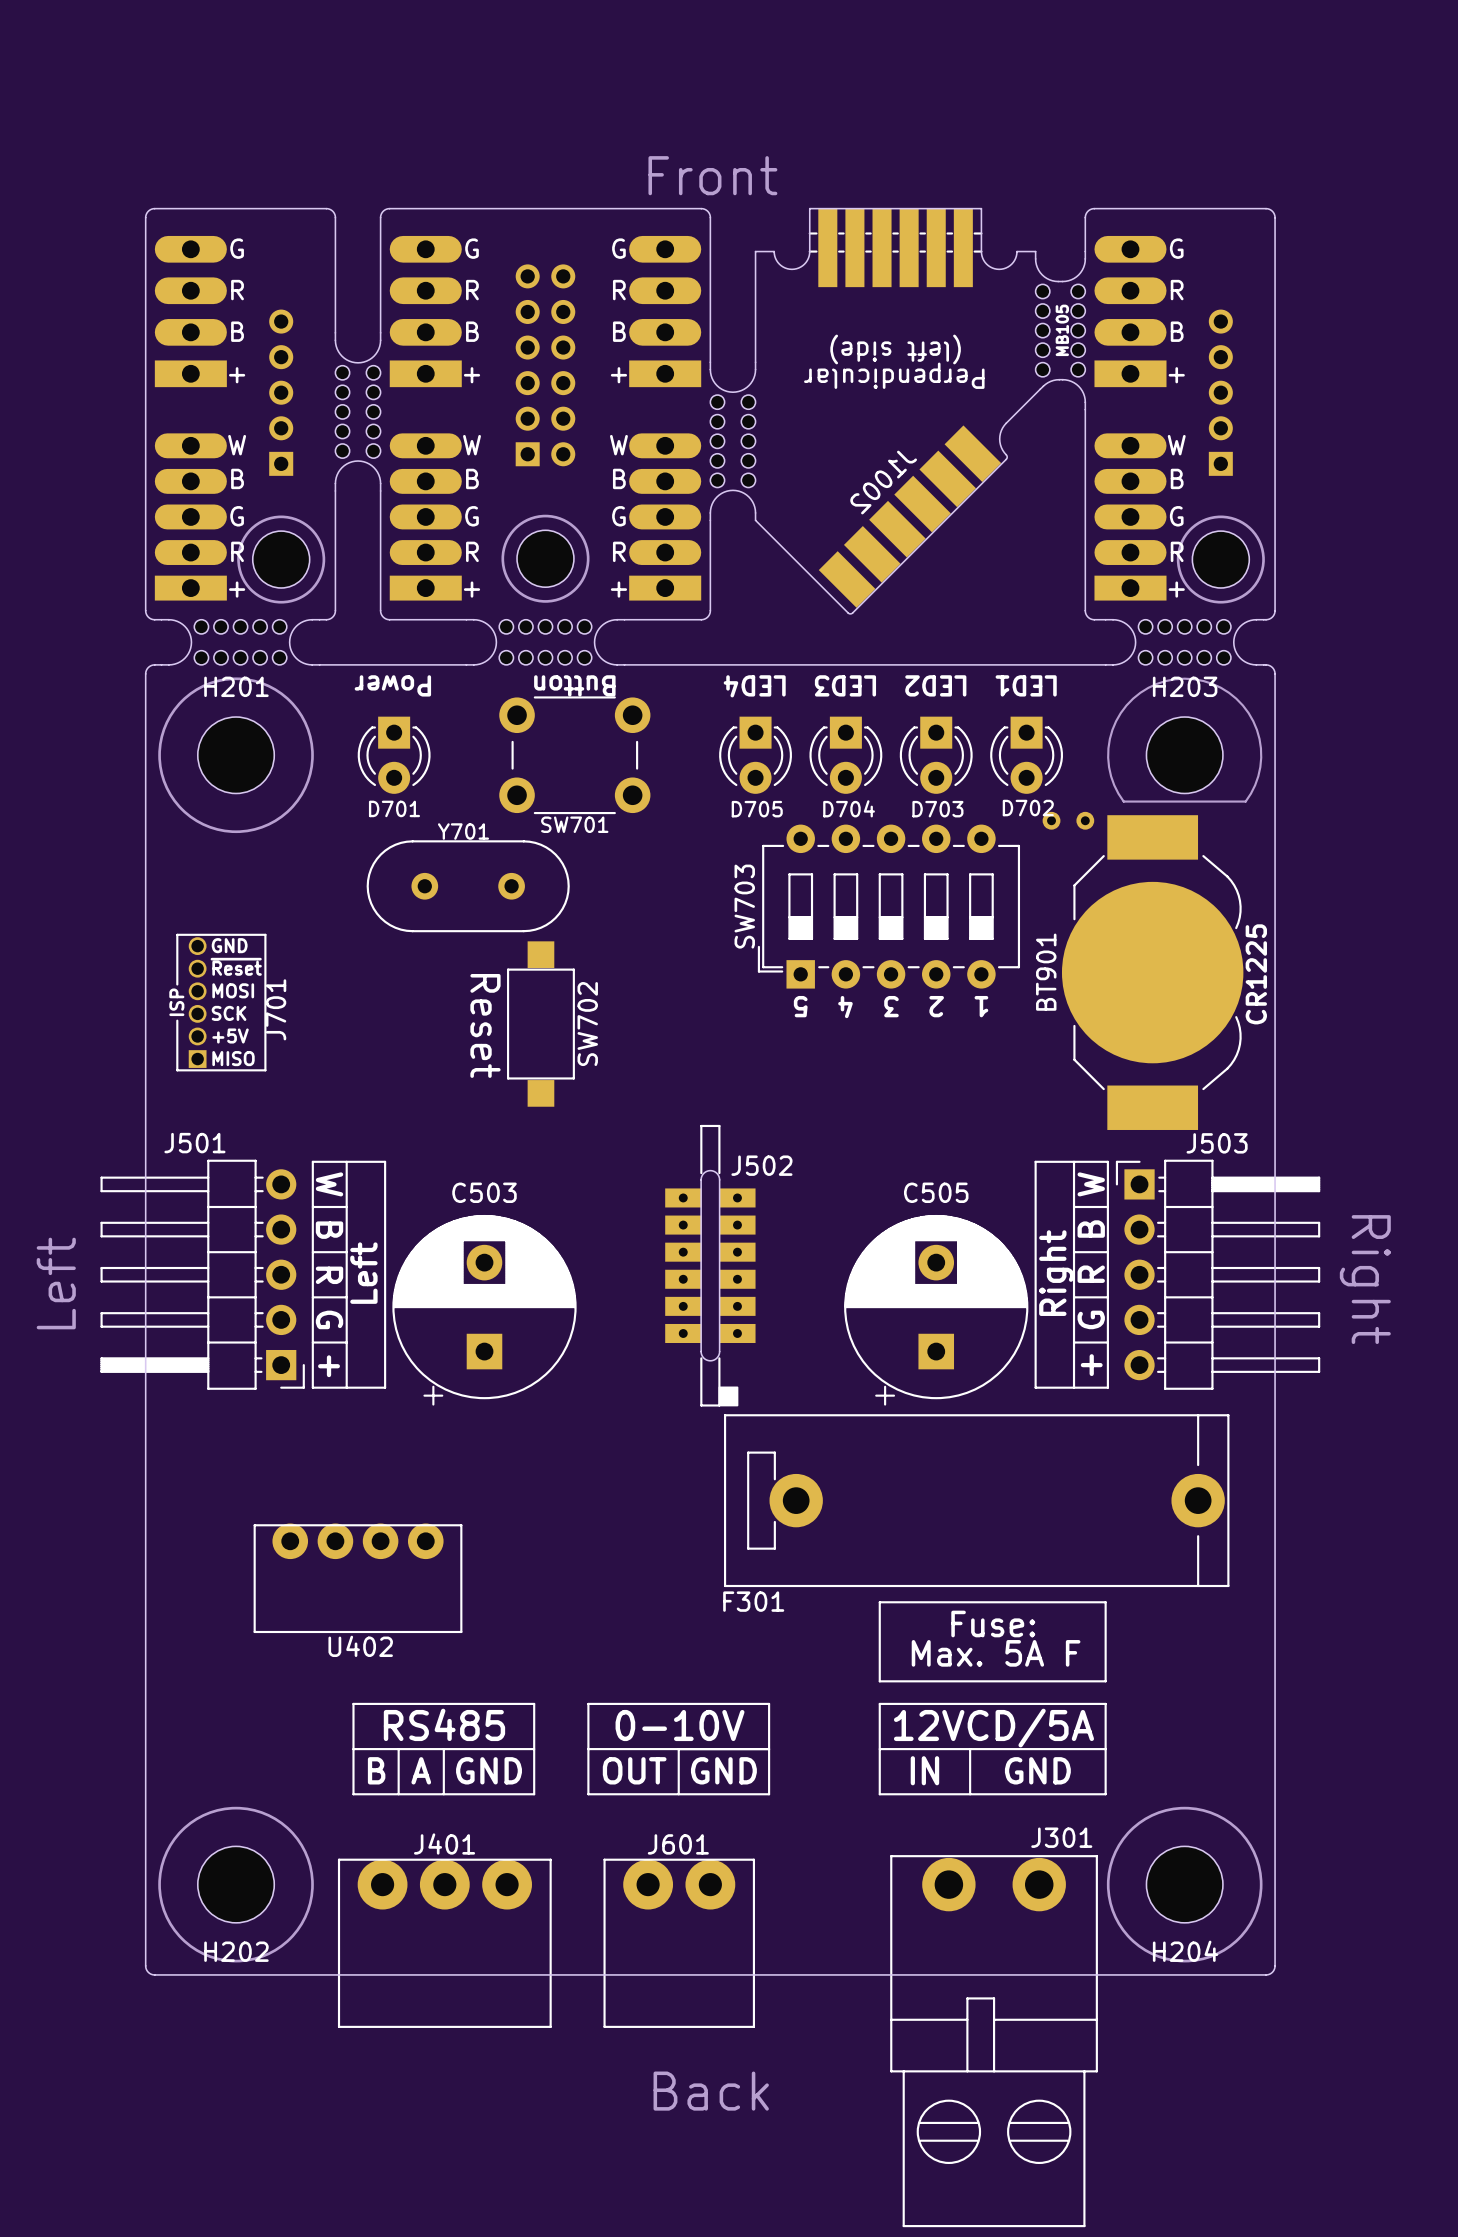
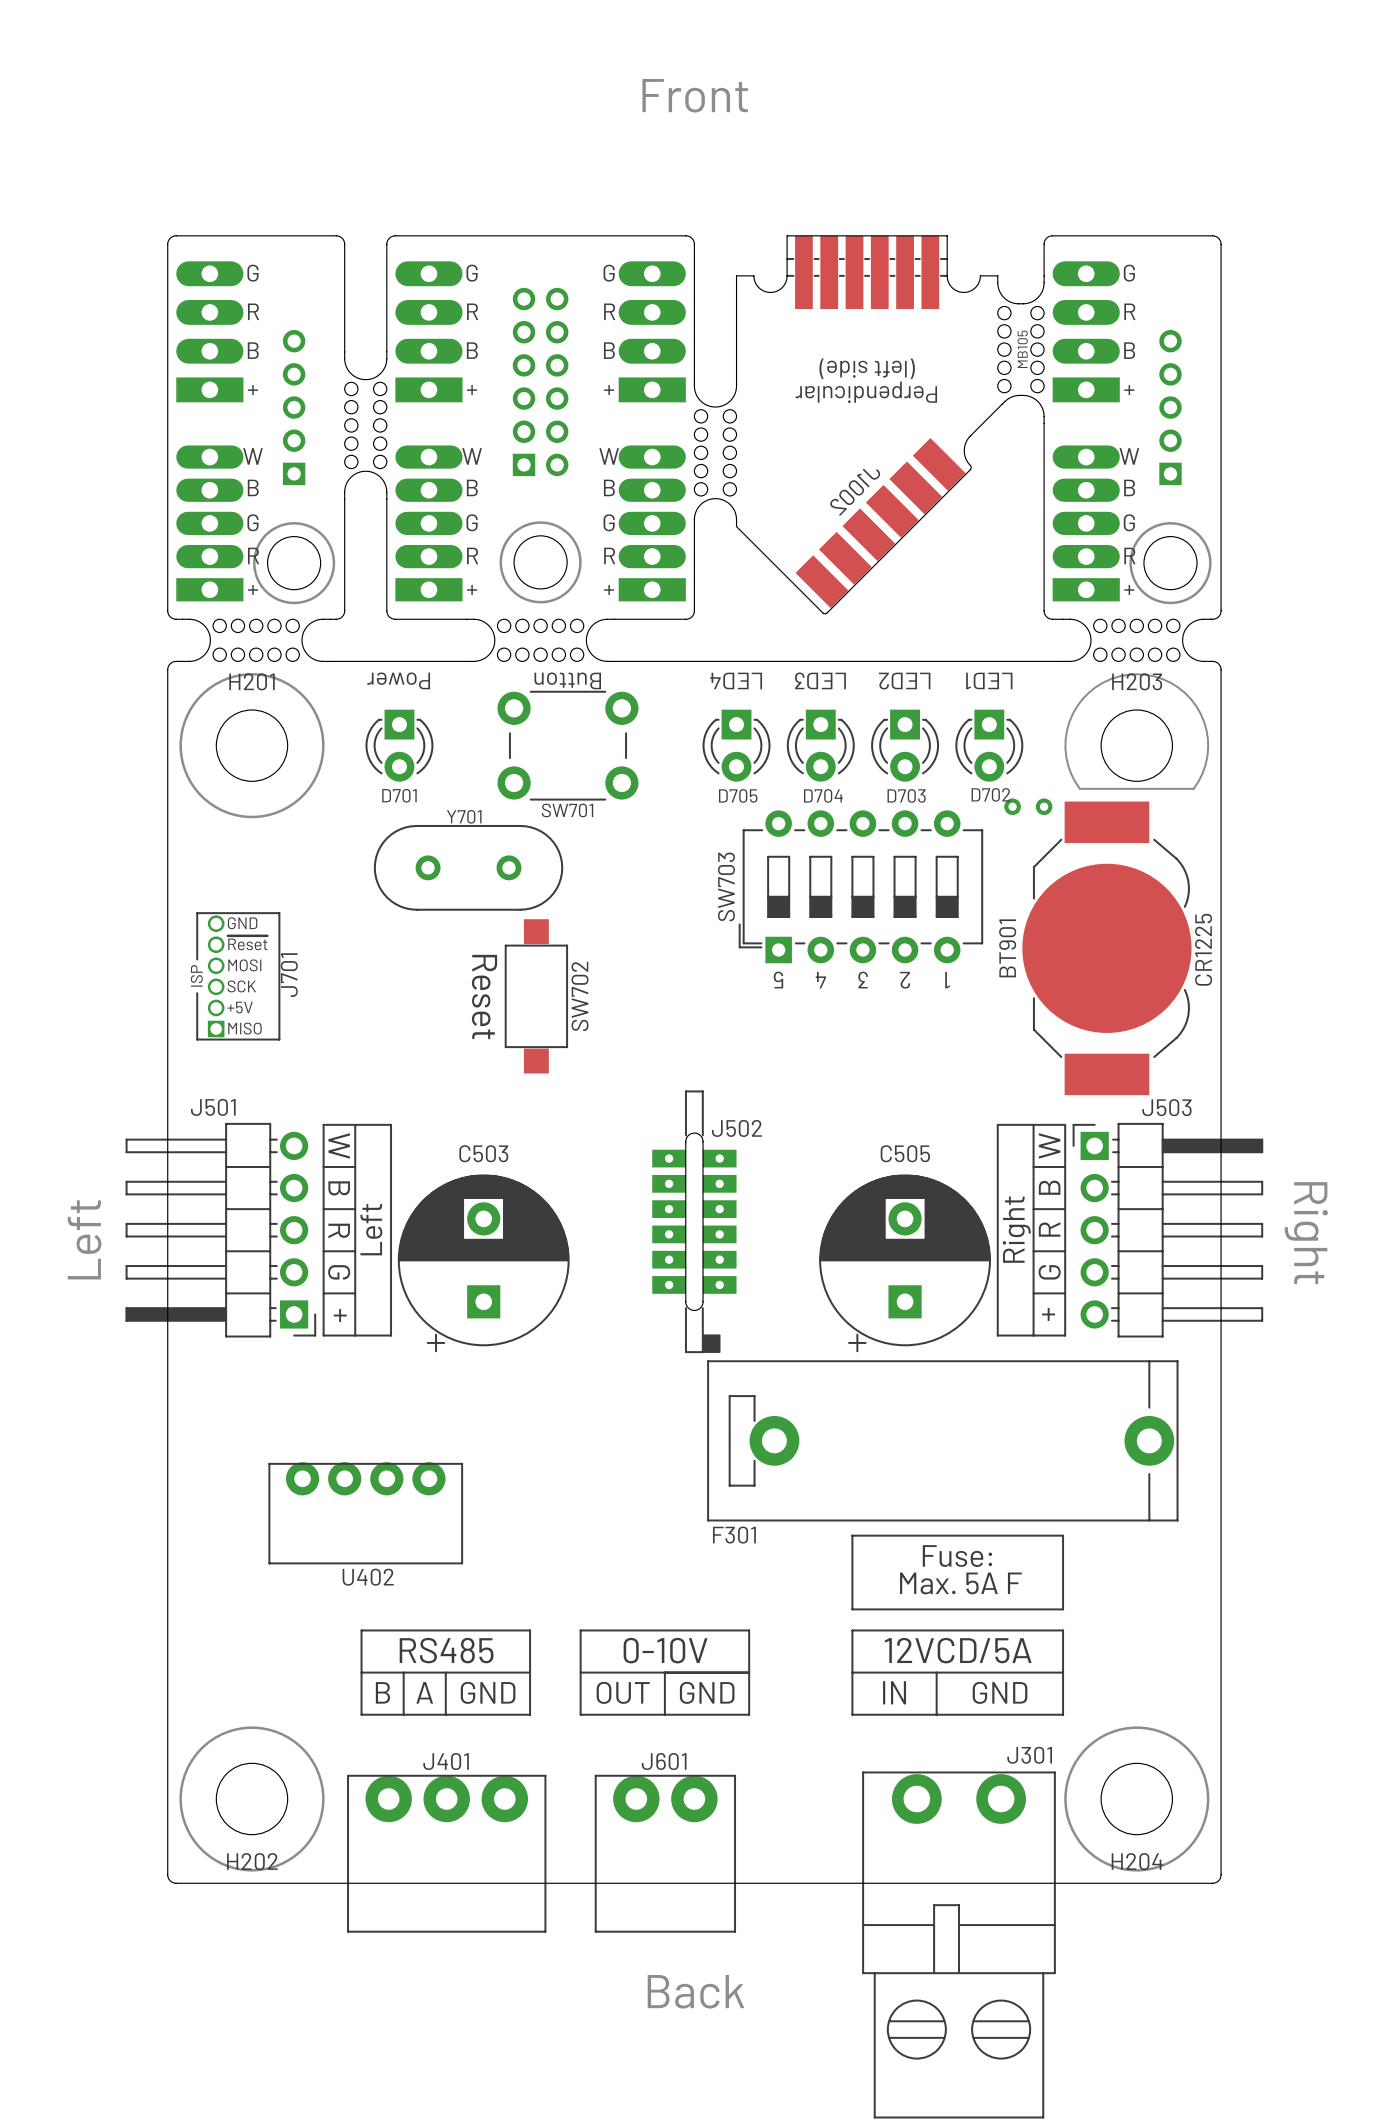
text position: Front (712, 175) -> Front (695, 95)

